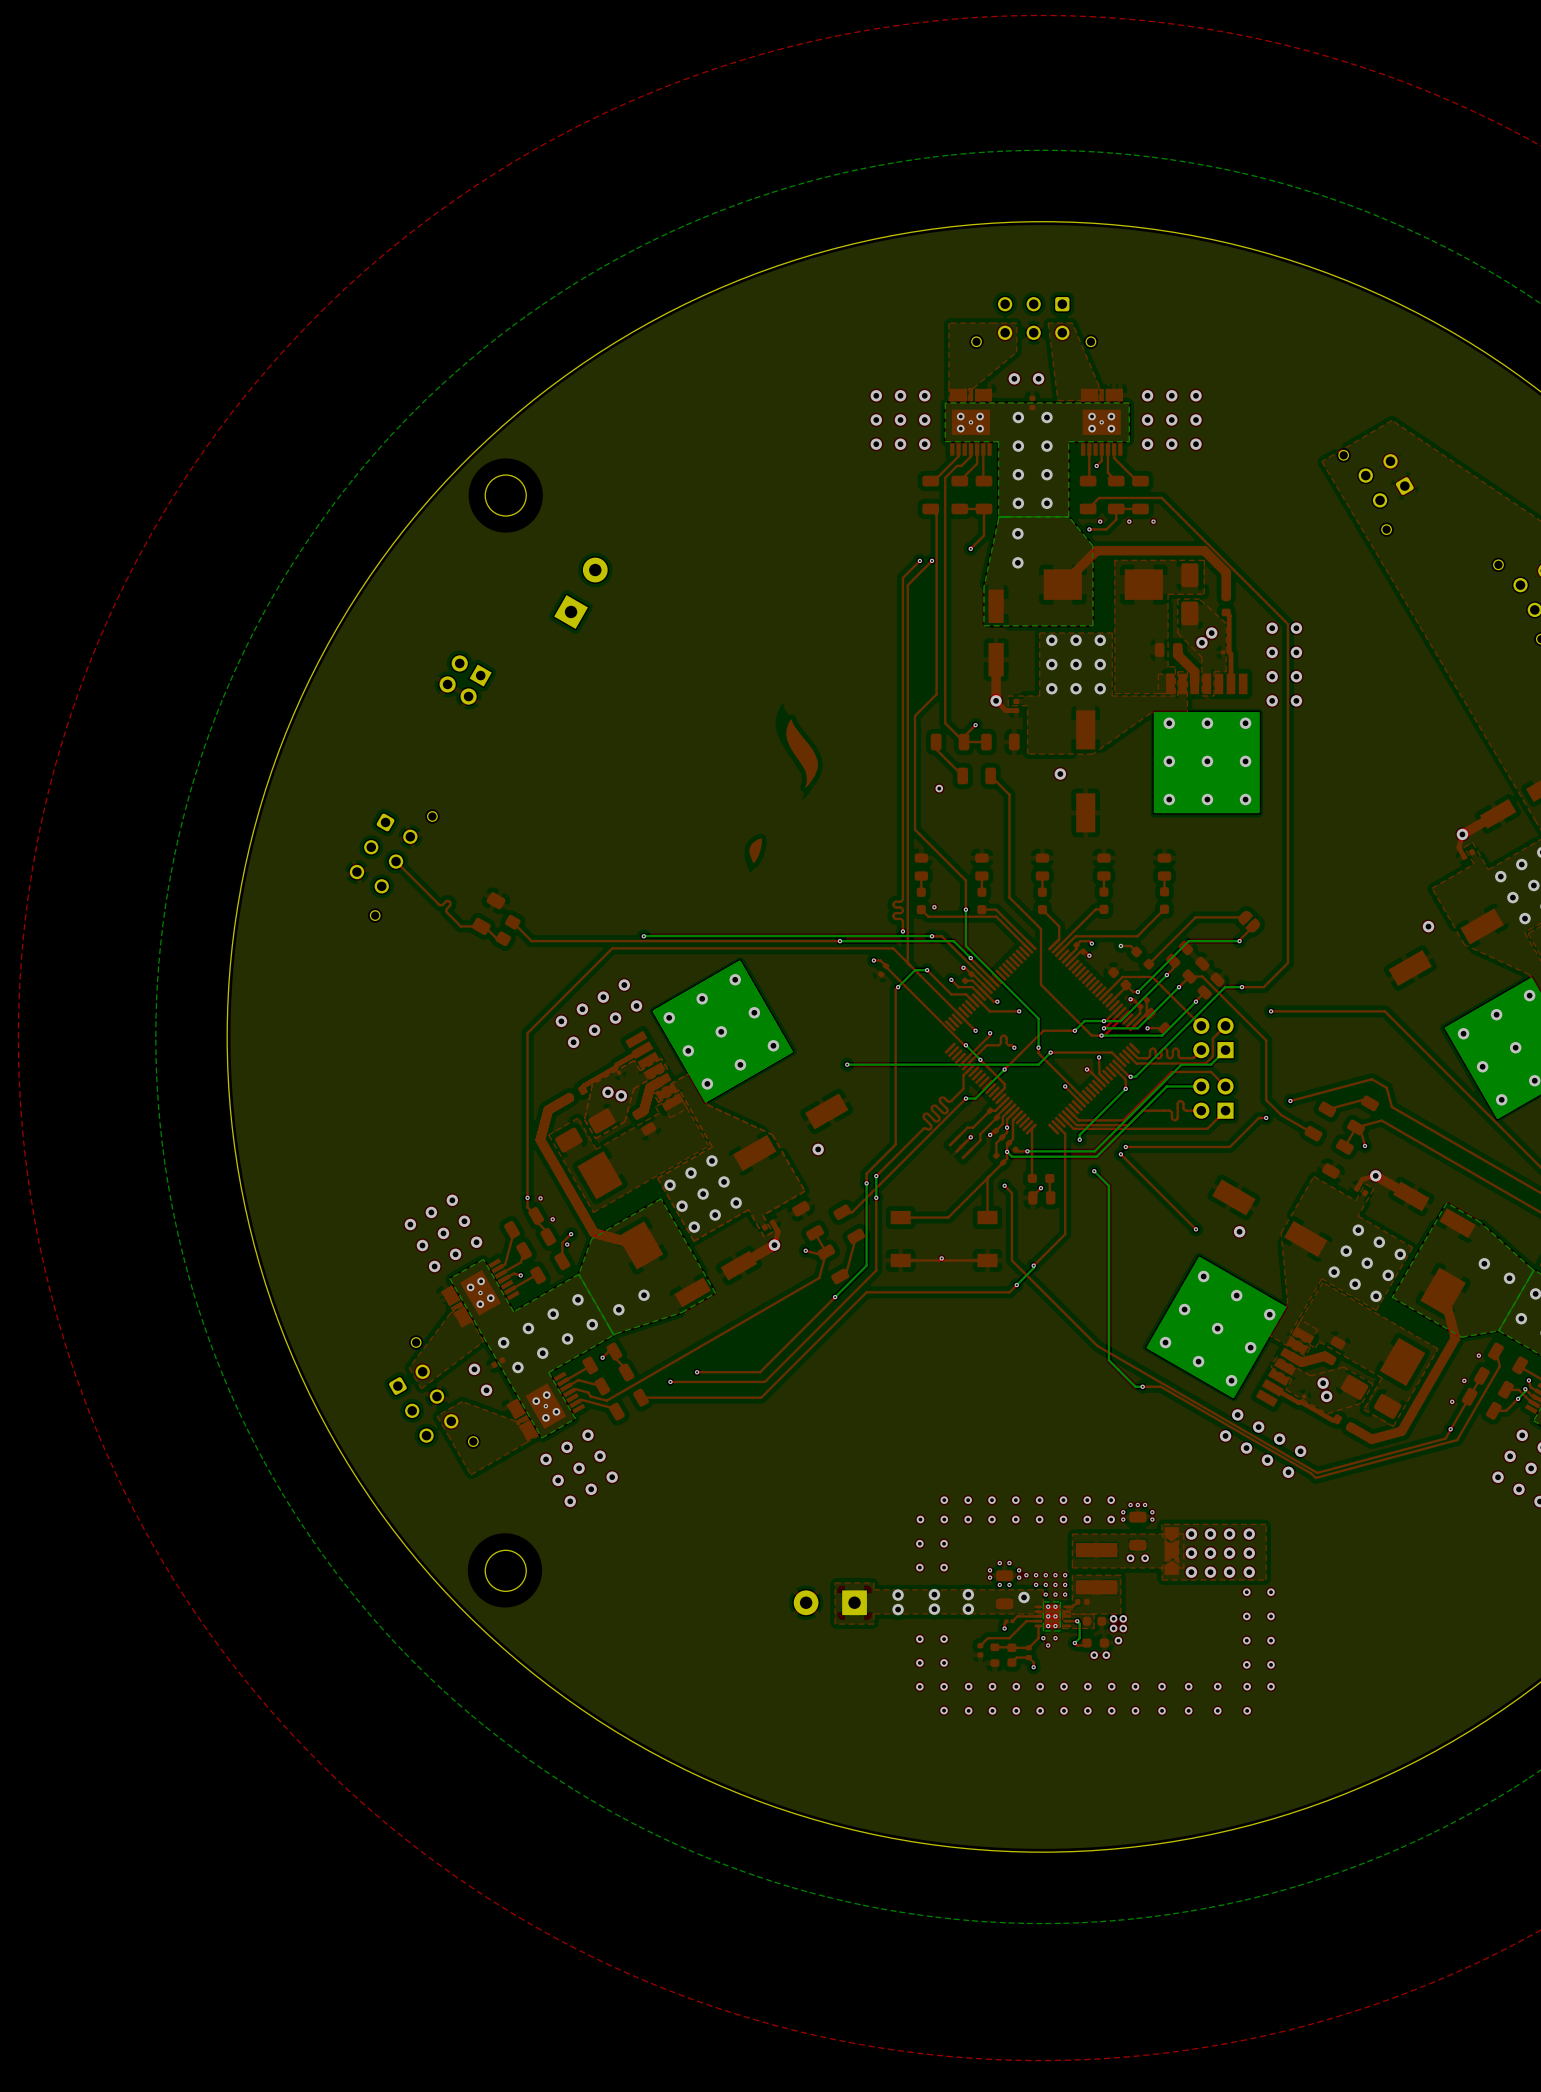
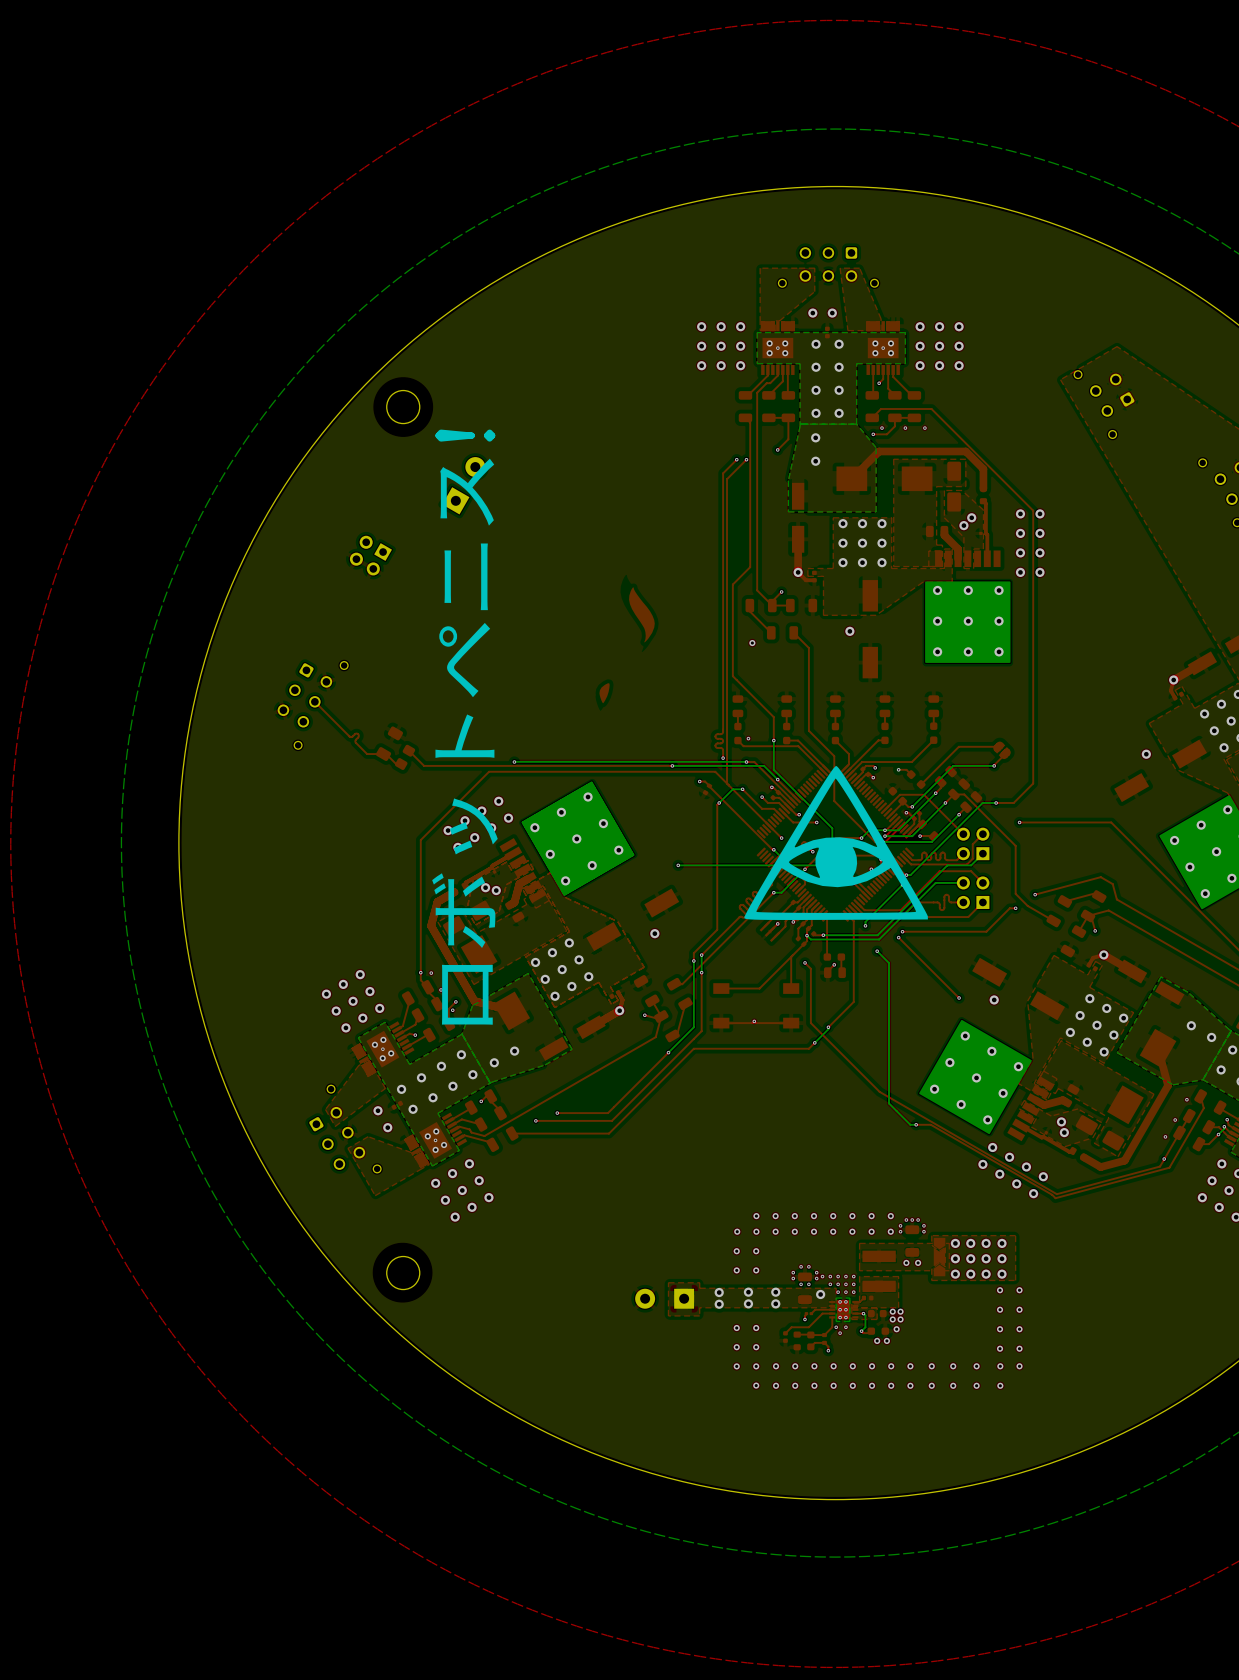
text: none -> ロボットペニス! (464, 728)
drawing: none -> [744, 765, 928, 920]

